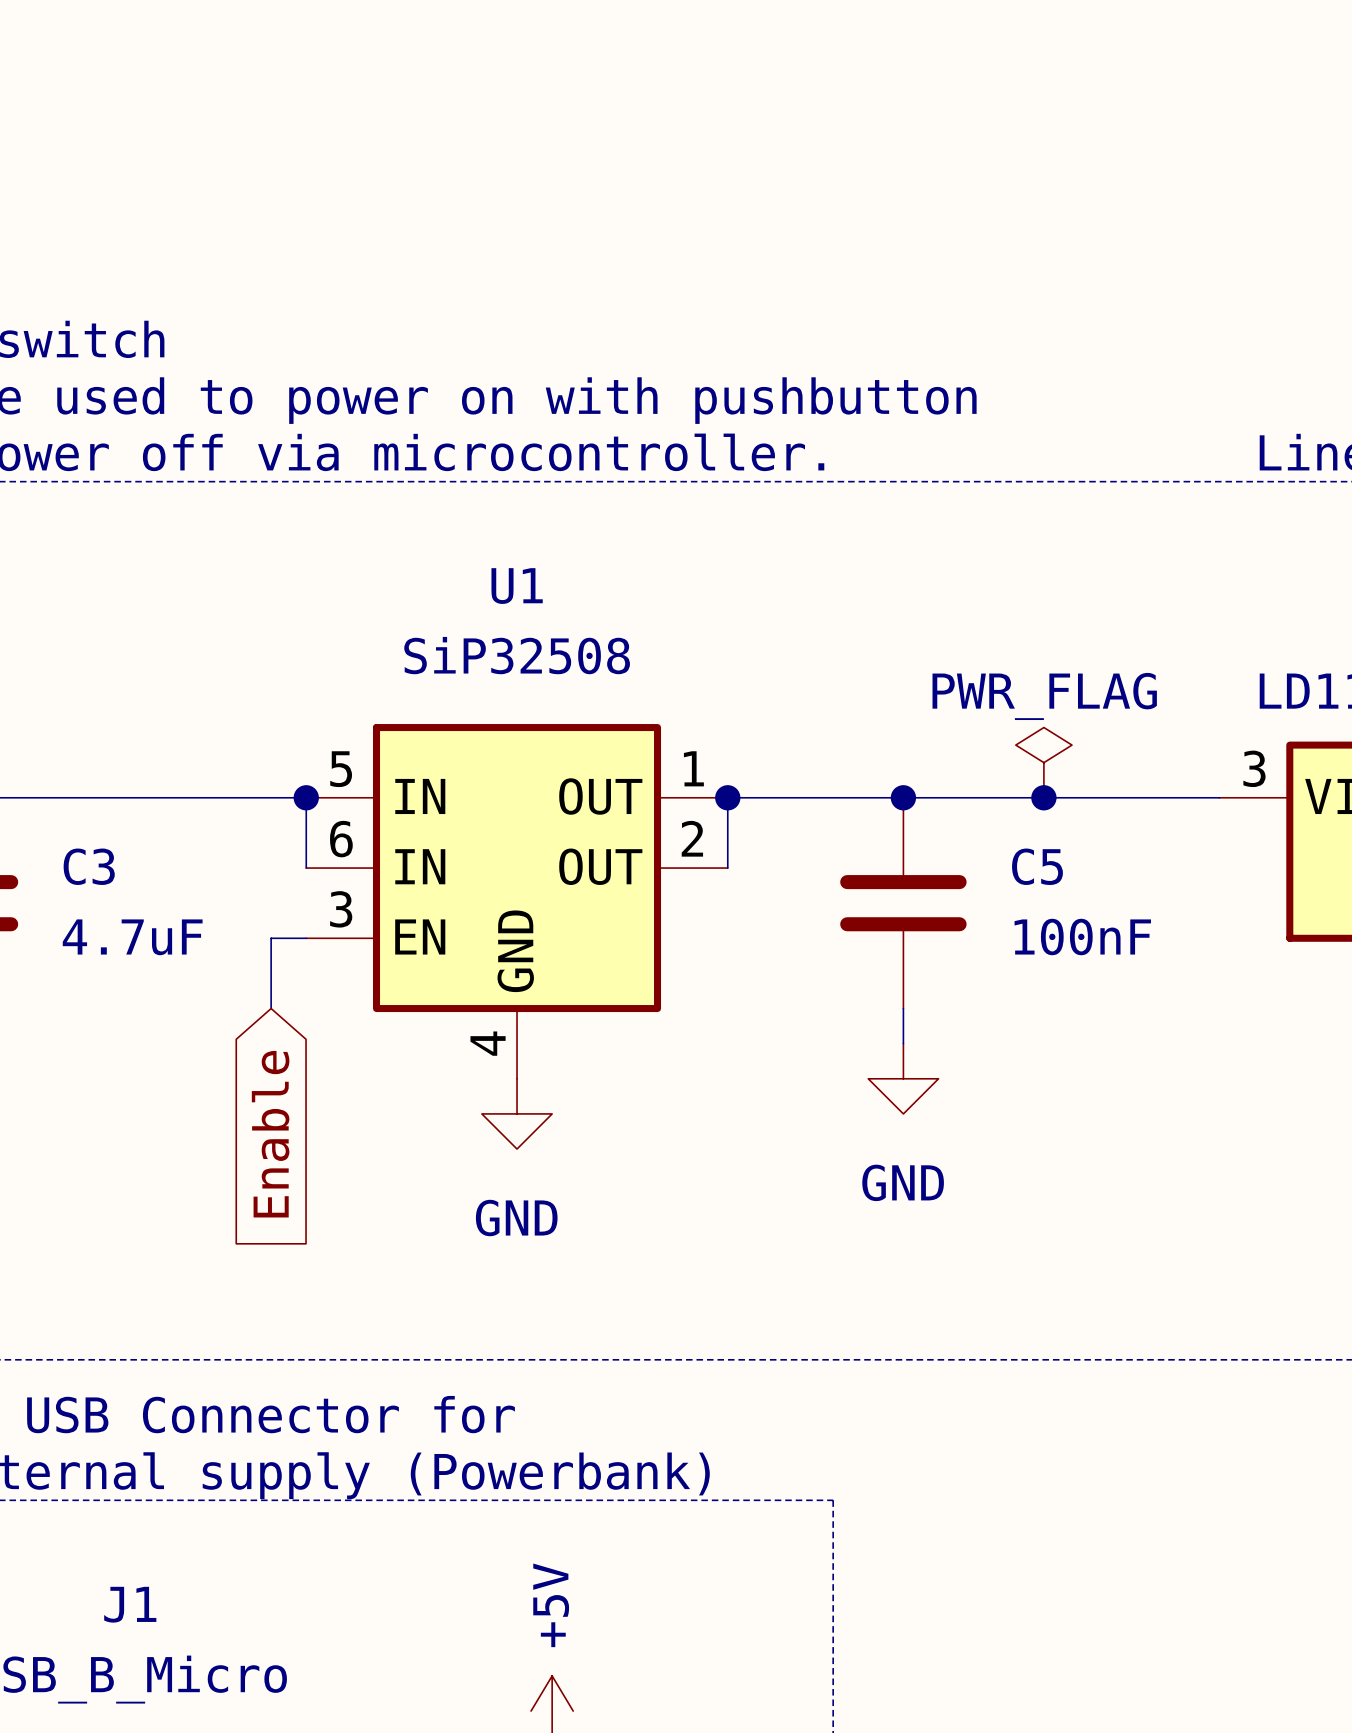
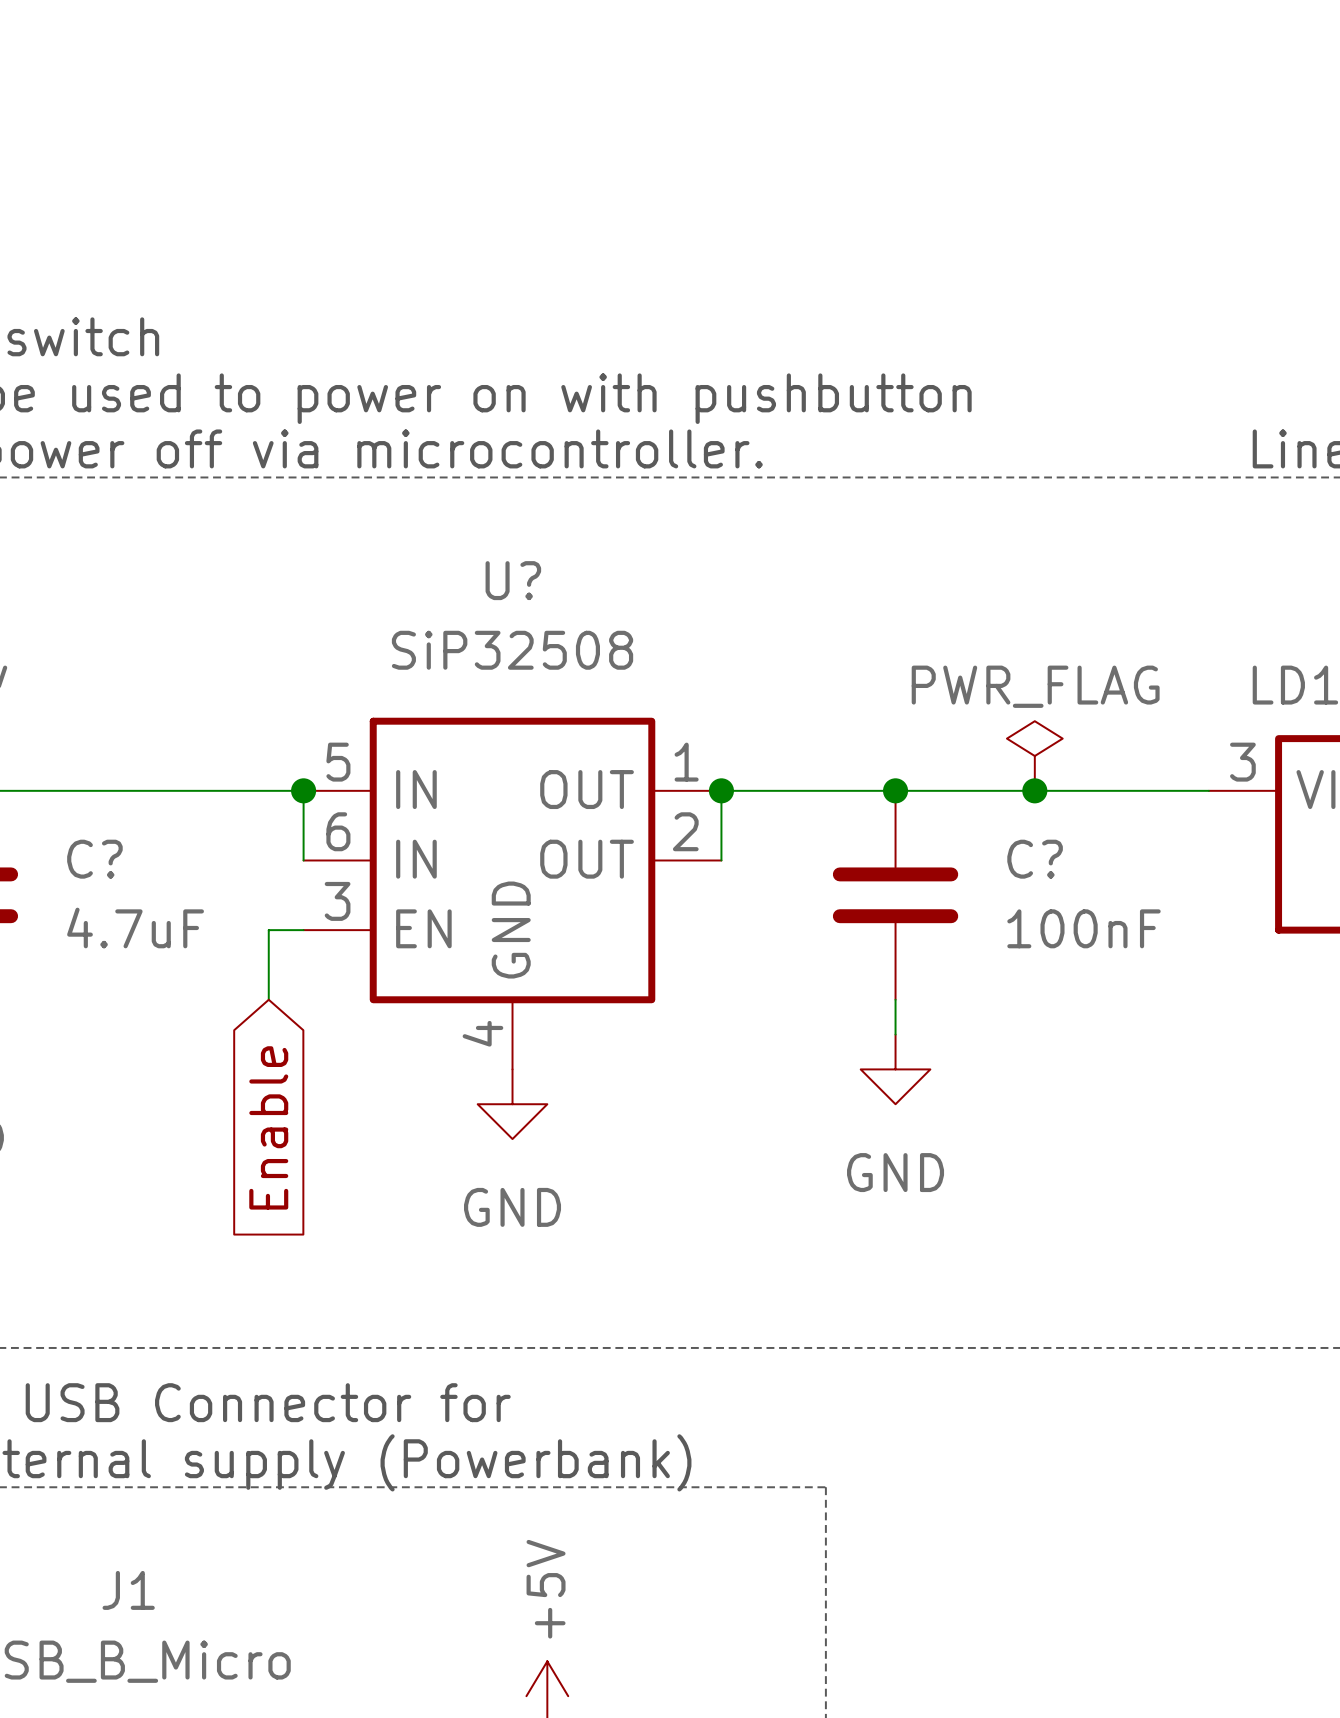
U1 name: U1 (517, 586) -> U? (513, 580)
C3 name: C3 (89, 866) -> C? (94, 859)
C5 name: C5 (1037, 866) -> C? (1035, 859)

